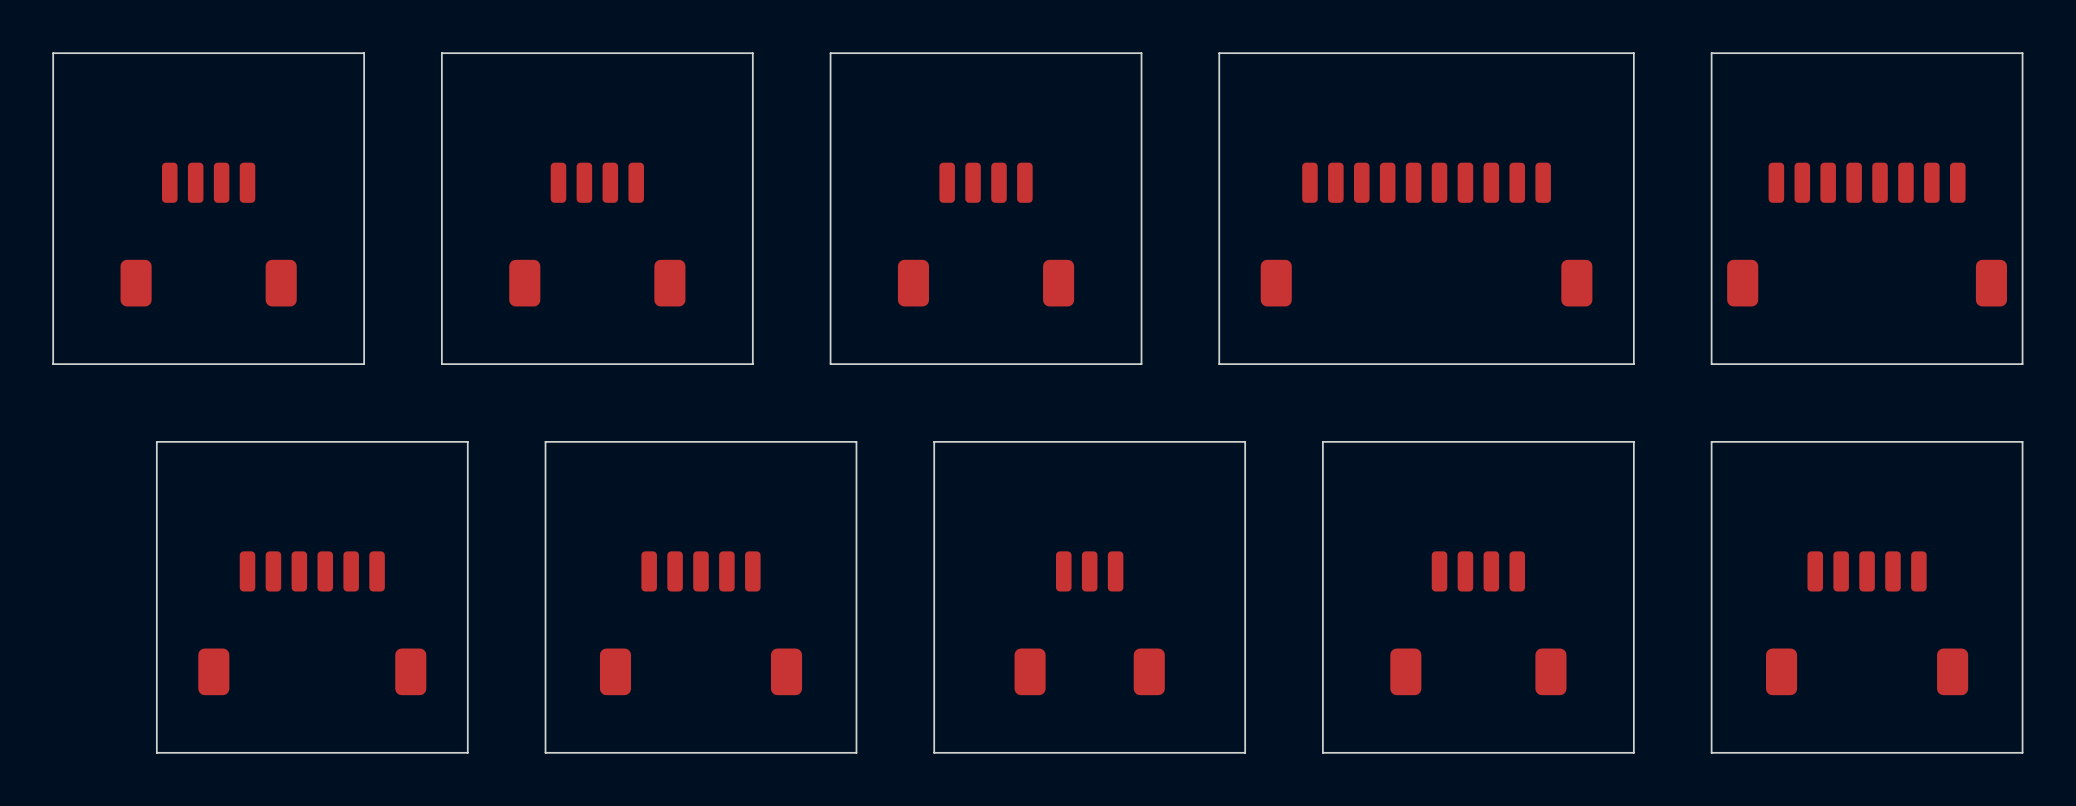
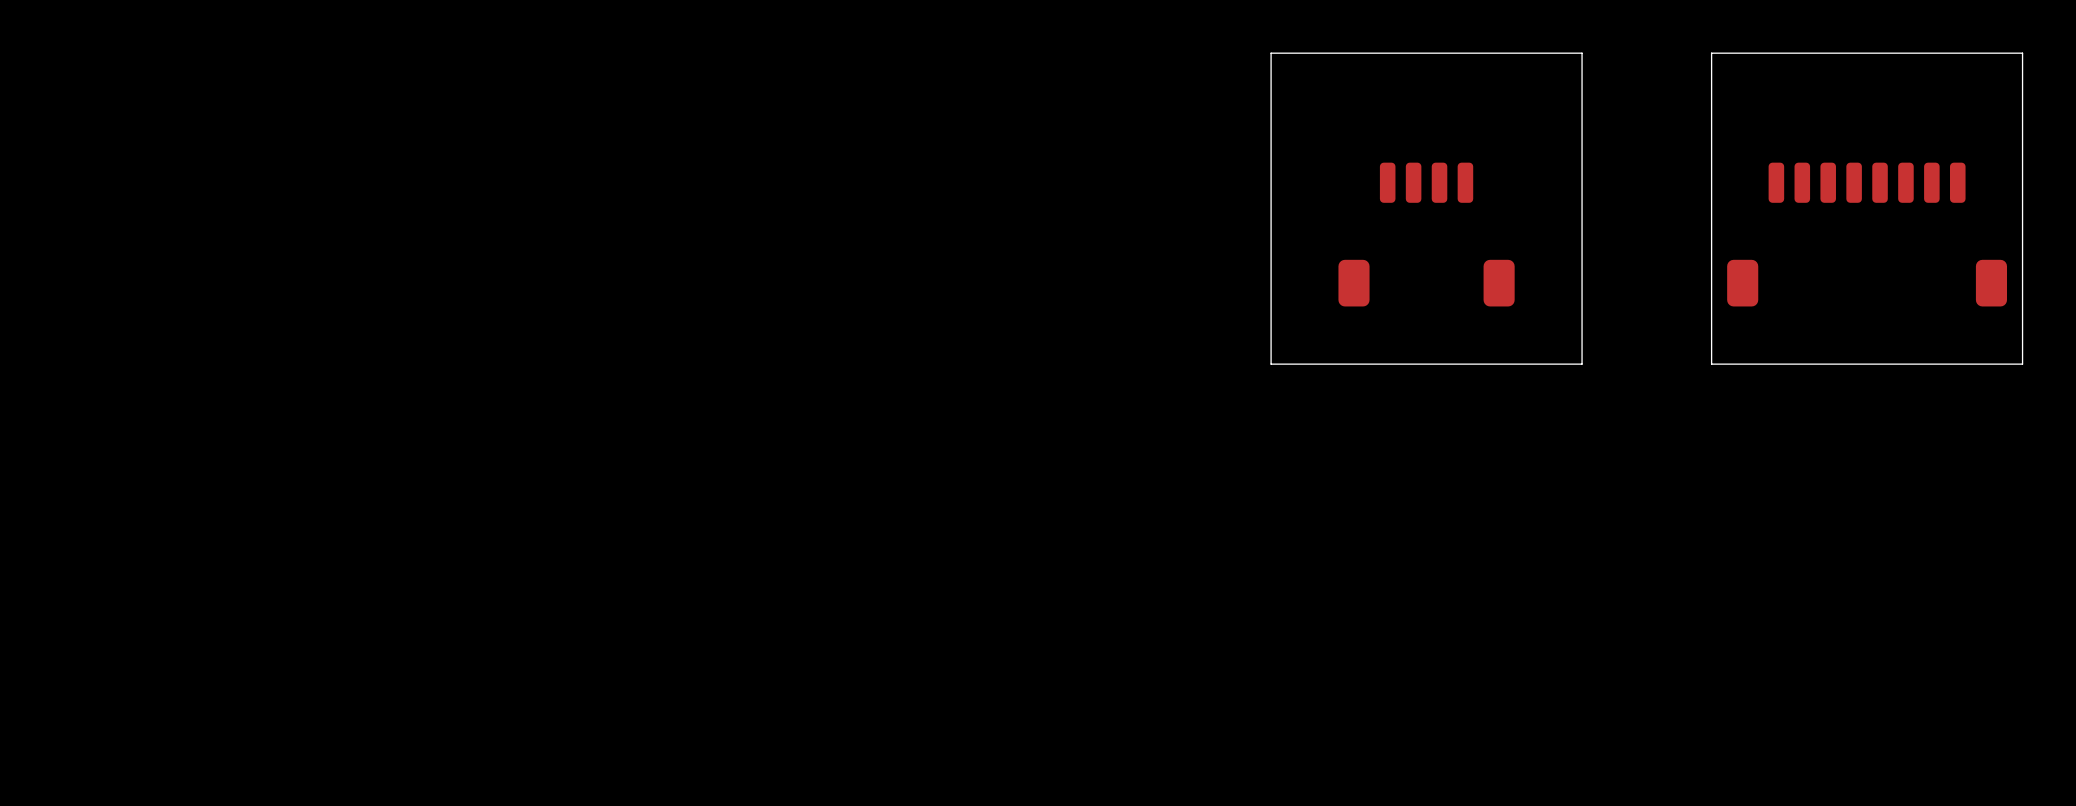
board edge: (364, 53) (53, 53) (53, 364) (364, 364) (364, 53) -> none
board edge: (752, 53) (441, 53) (441, 364) (752, 364) (752, 53) -> none
board edge: (1141, 53) (830, 53) (830, 364) (1141, 364) (1141, 53) -> none
board edge: (1271, 53) (1219, 53) (1219, 364) (1271, 364) -> (1271, 53) (1271, 364)
board edge: (1582, 53) (1633, 53) (1633, 364) (1582, 364) -> (1582, 53) (1582, 364)
part footprint: [1260, 162, 1593, 307] -> [1338, 162, 1515, 307]
part: (208, 234) -> none
part: (597, 234) -> none
part: (986, 234) -> none
board edge: (467, 441) (156, 441) (156, 752) (467, 752) (467, 441) -> none
board edge: (856, 441) (545, 441) (545, 752) (856, 752) (856, 441) -> none
board edge: (1245, 441) (934, 441) (934, 752) (1245, 752) (1245, 441) -> none
board edge: (1633, 441) (1322, 441) (1322, 752) (1633, 752) (1633, 441) -> none
board edge: (2022, 441) (2022, 752) (1711, 752) (1711, 441) (2022, 441) -> none
part: (312, 623) -> none
part: (700, 623) -> none
part: (1089, 623) -> none
part: (1478, 623) -> none
part: (1867, 623) -> none

